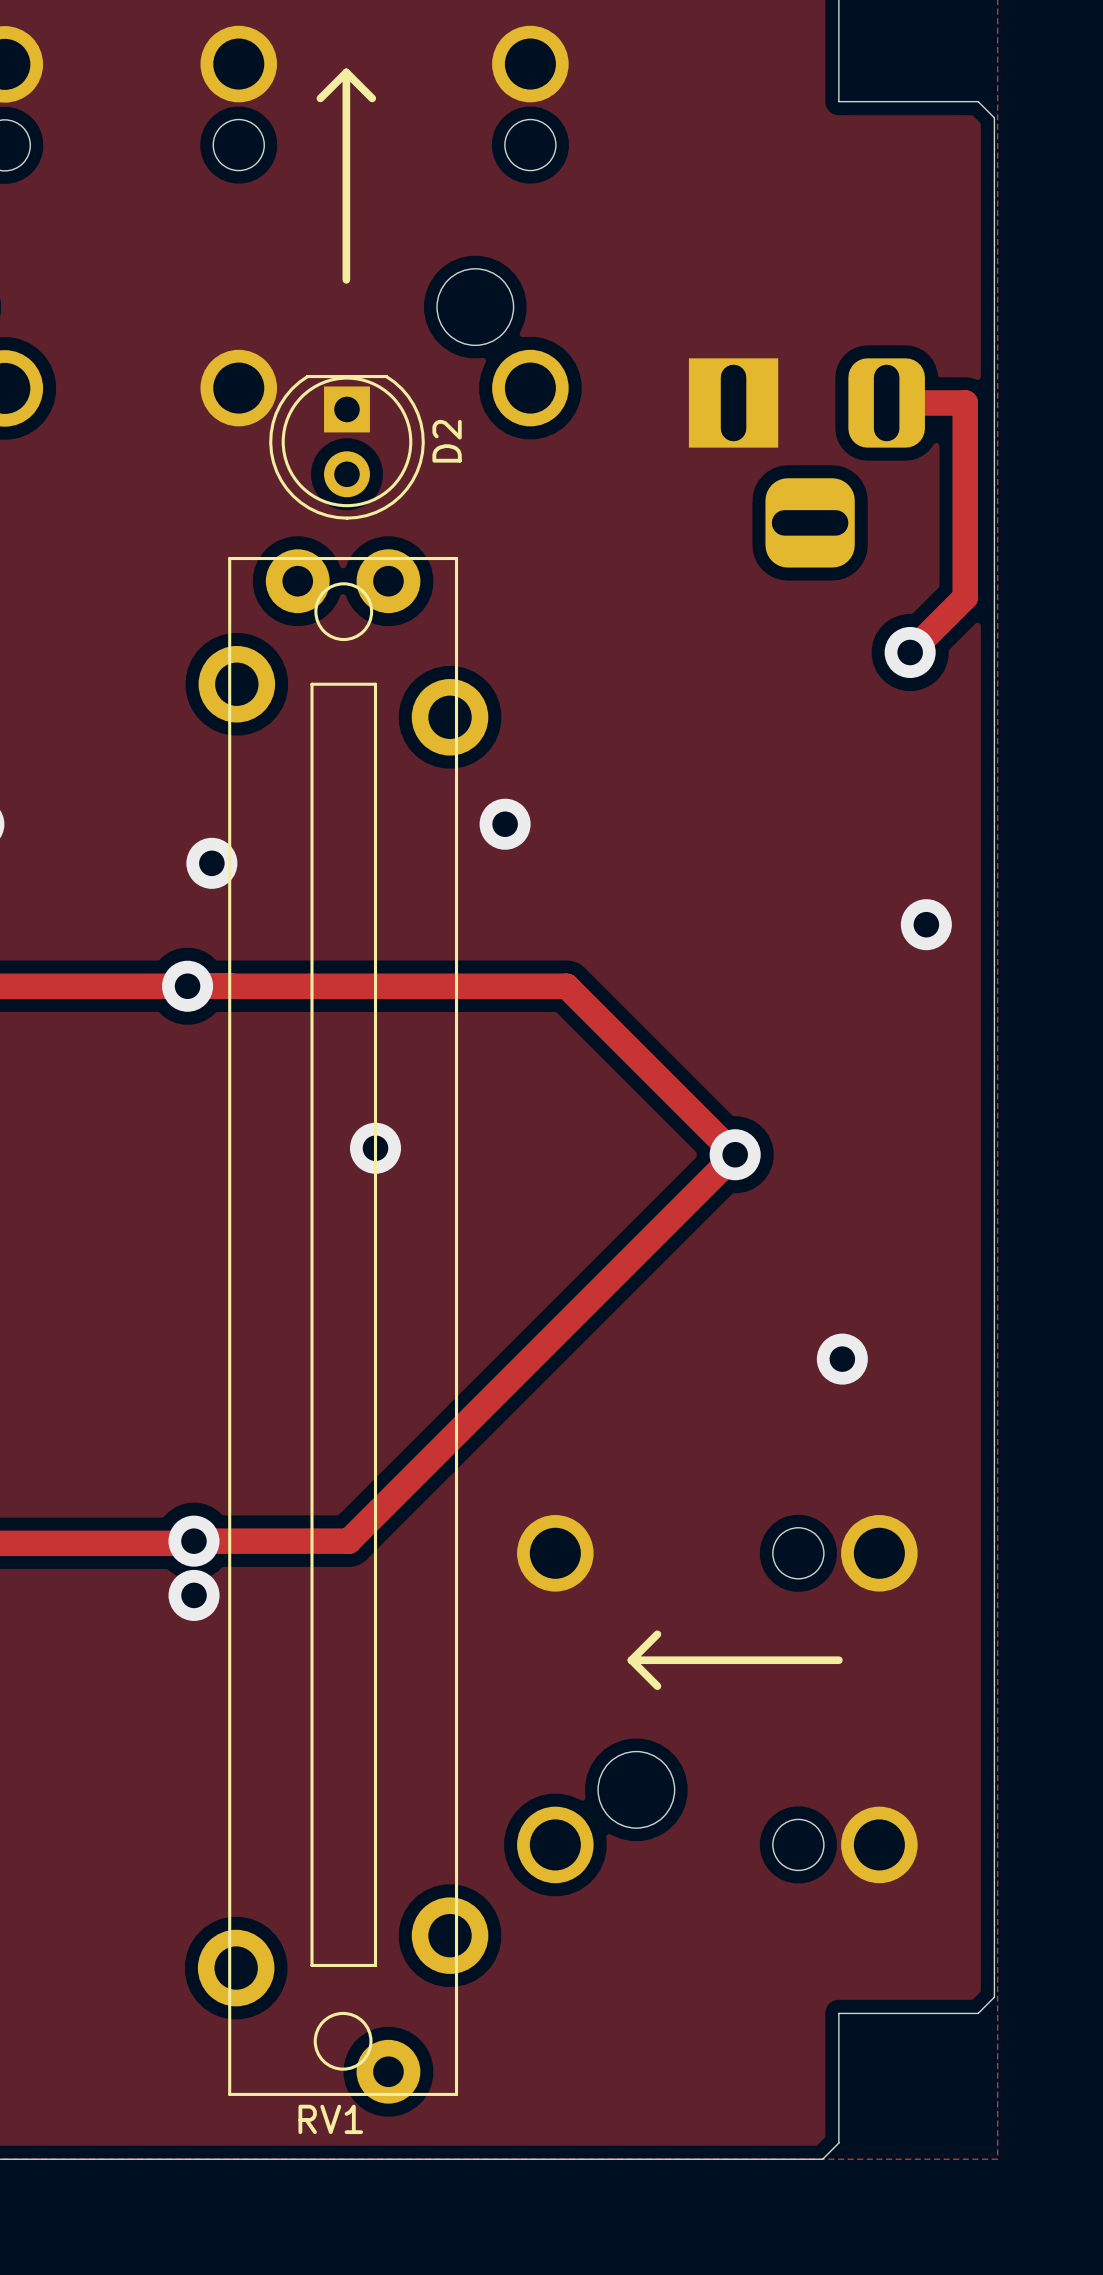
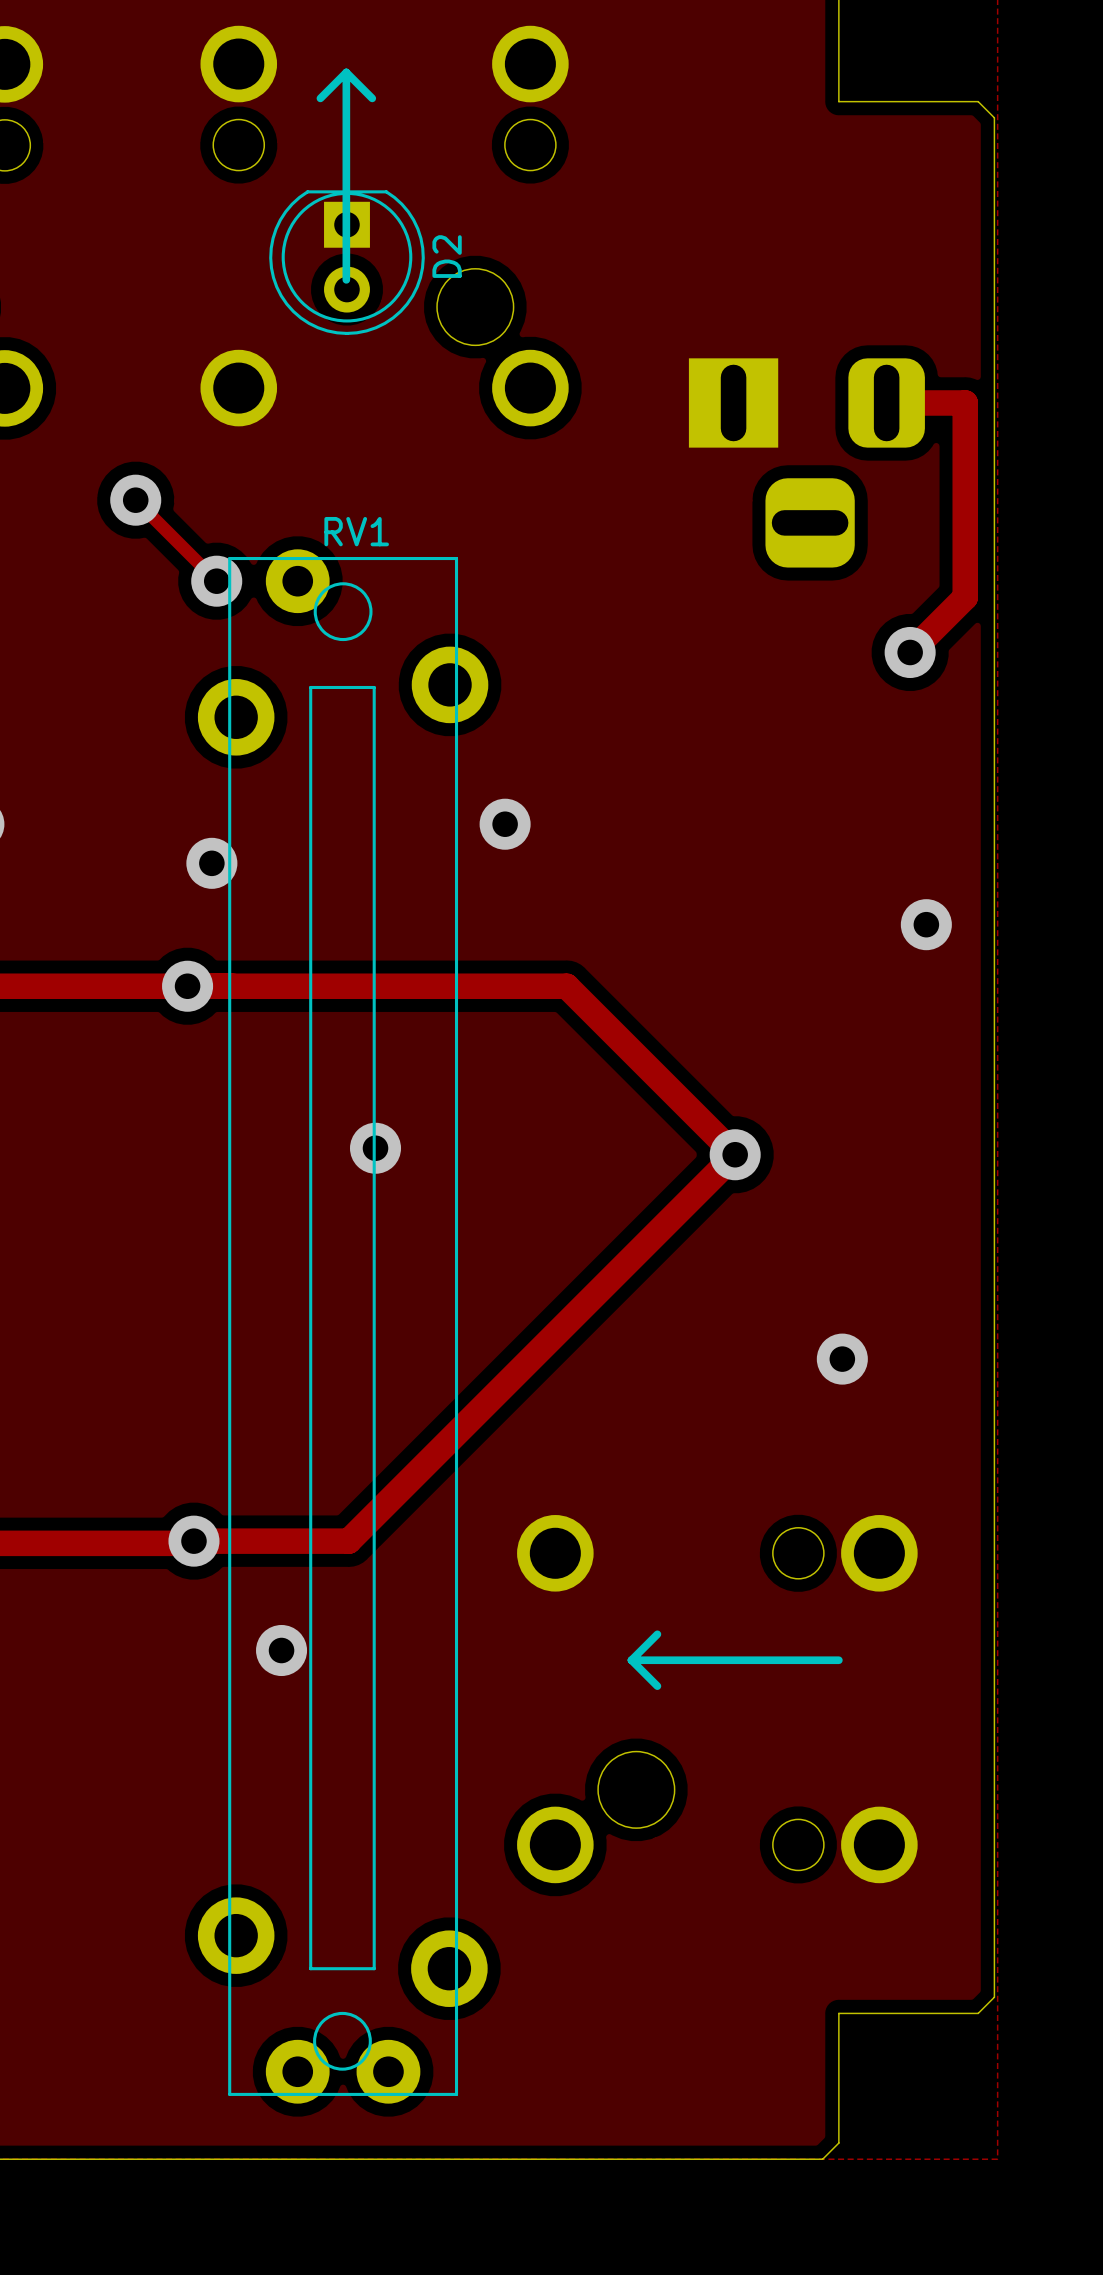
D2 position: (346, 447) -> (346, 262)
track: none -> (135, 500) (216, 581)
via: none -> (135, 500)
via: none -> (216, 581)
RV1 rotation: 0° (343, 1326) -> 180° (343, 1326)
via position: (194, 1595) -> (281, 1650)

